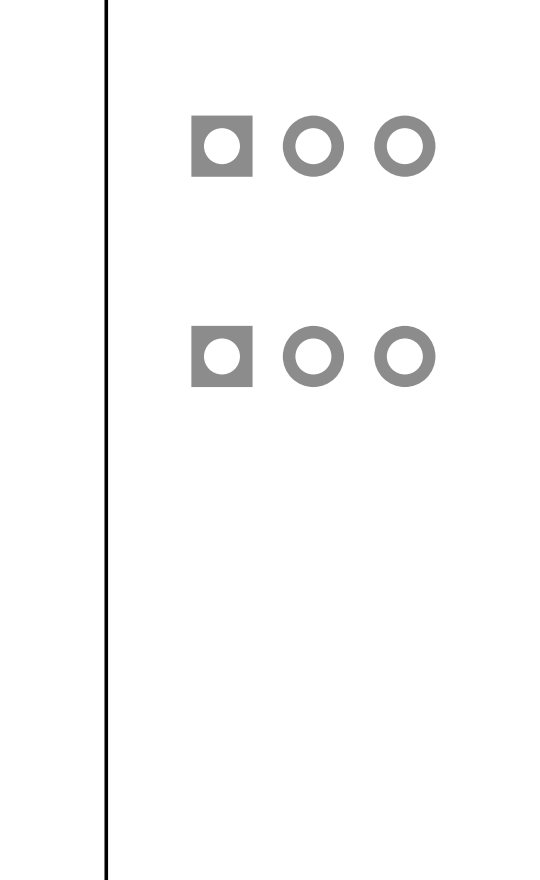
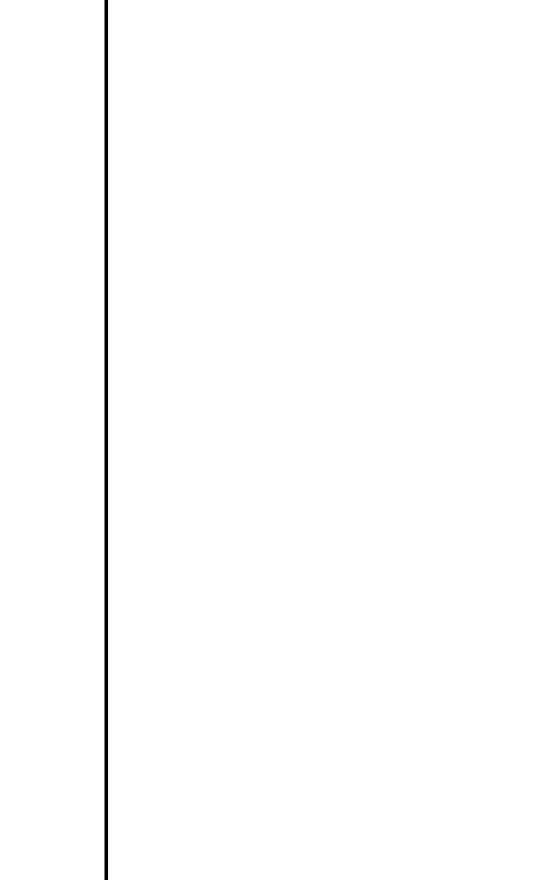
part: (313, 146) -> none
part: (313, 356) -> none

